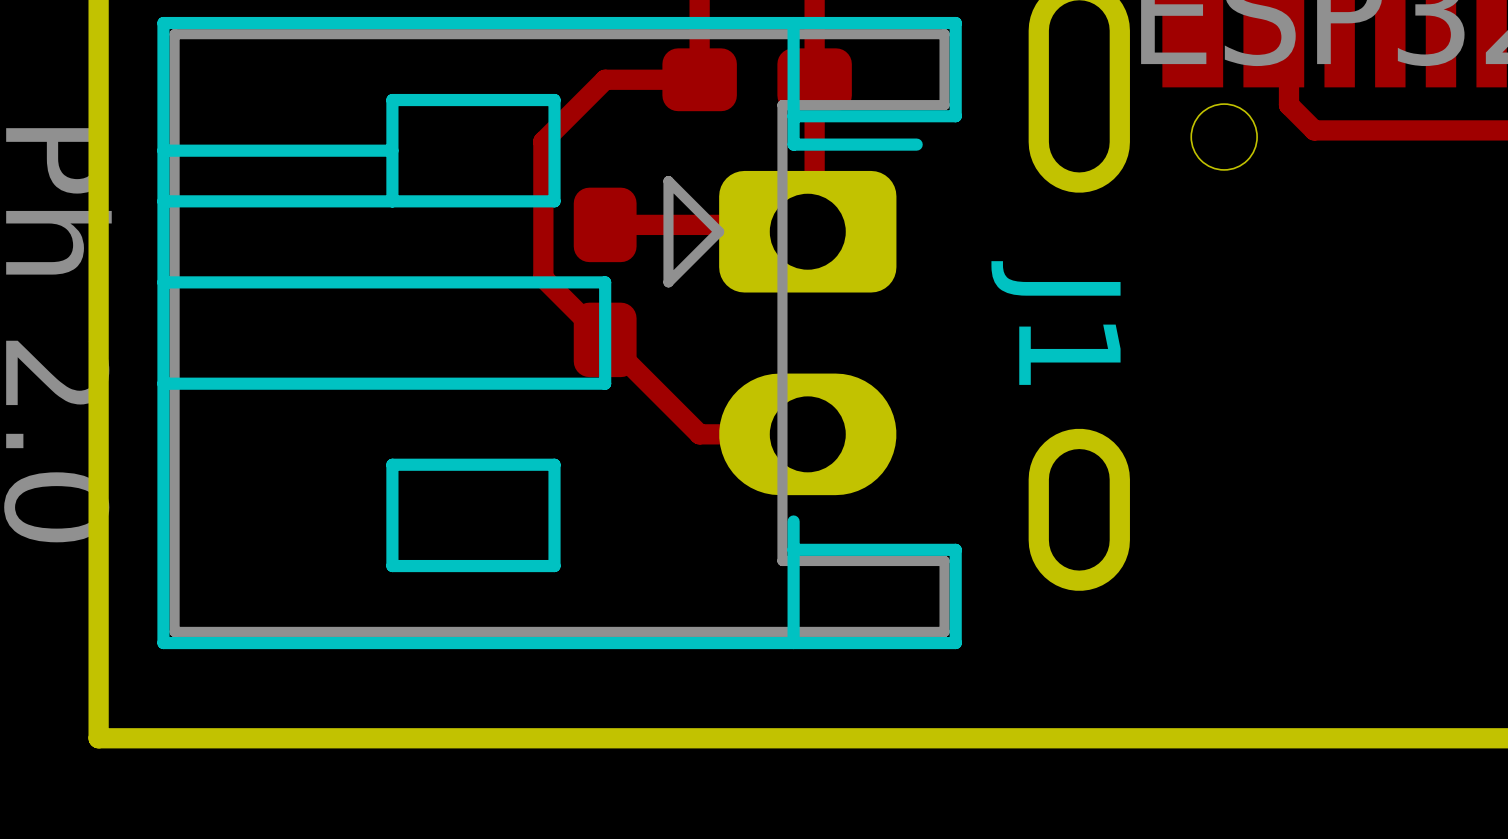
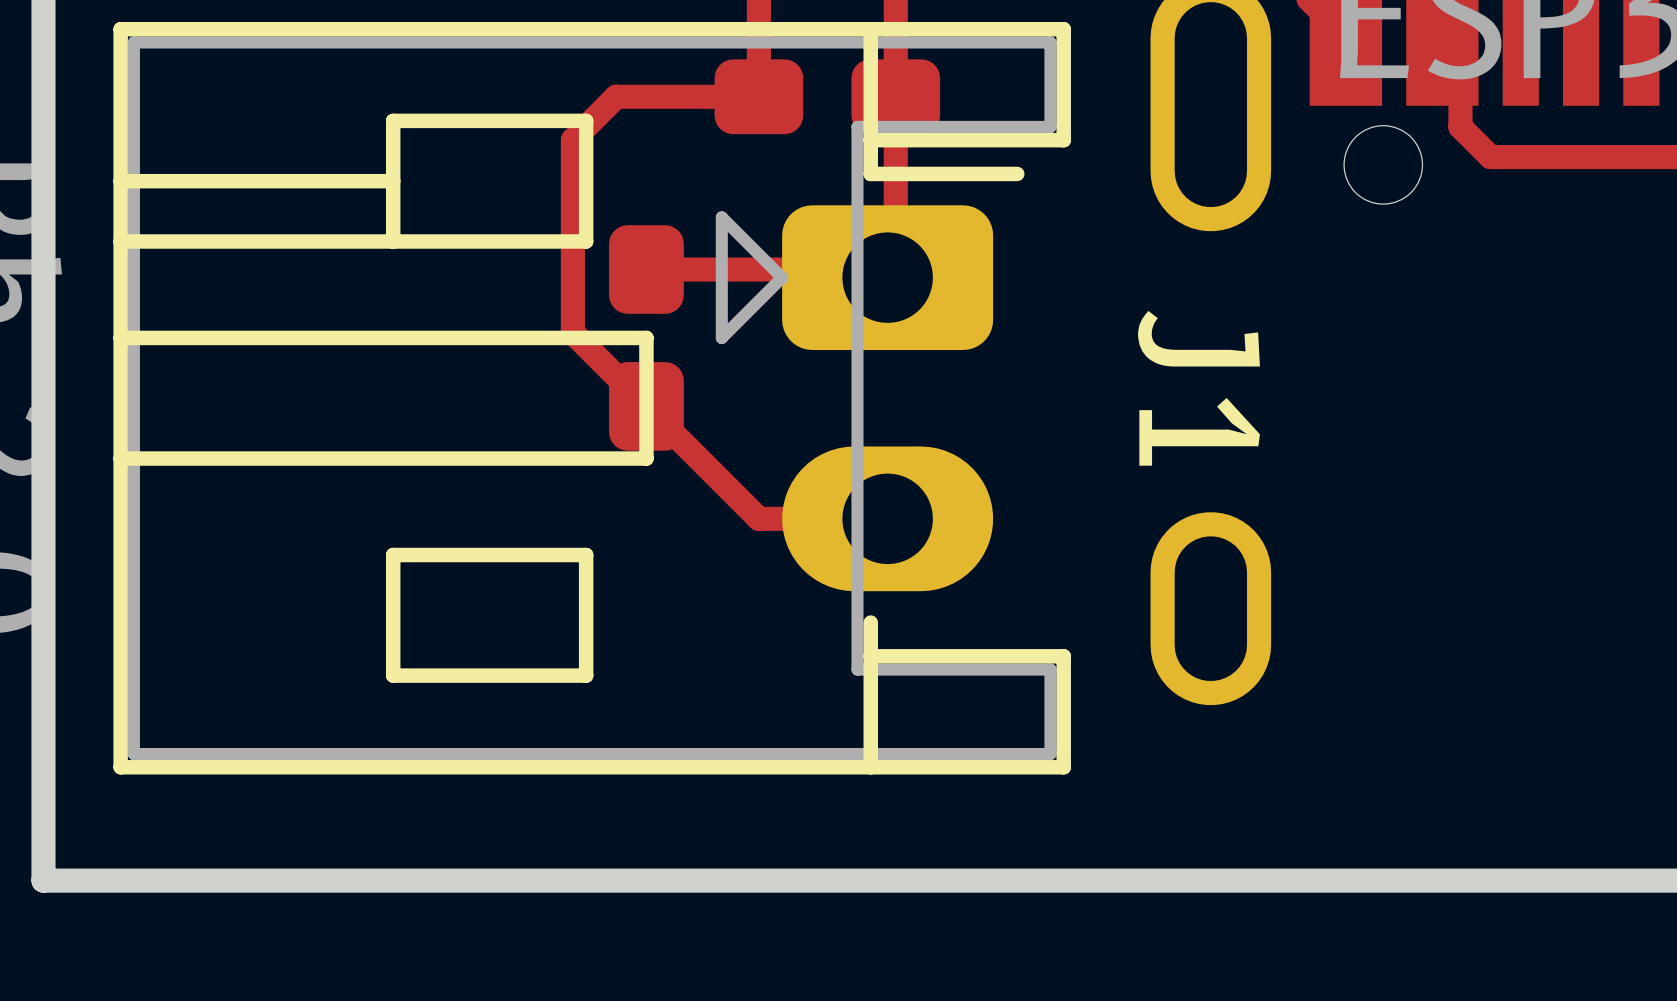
top track: (605, 79) (543, 141) -> (646, 96) (616, 96) (572, 140) (572, 170)

